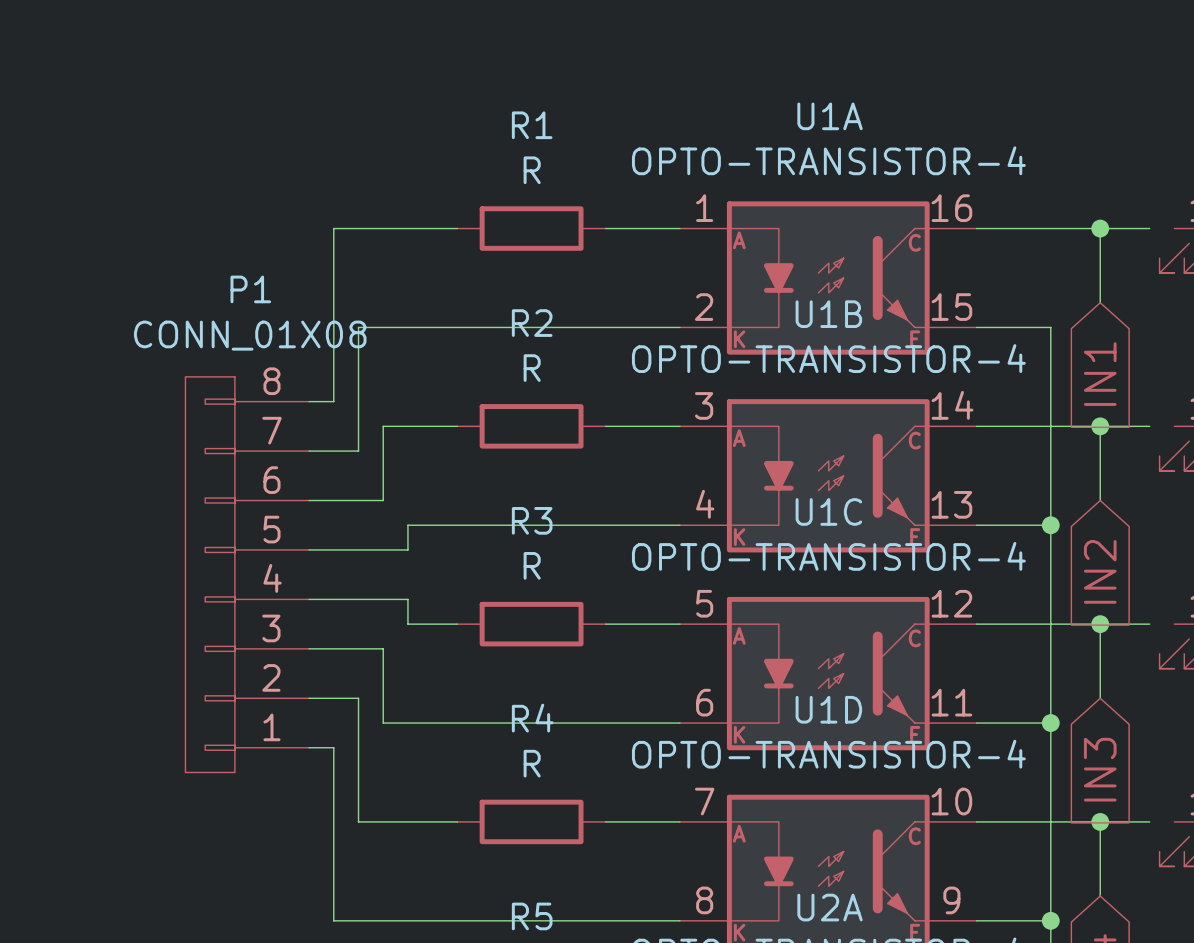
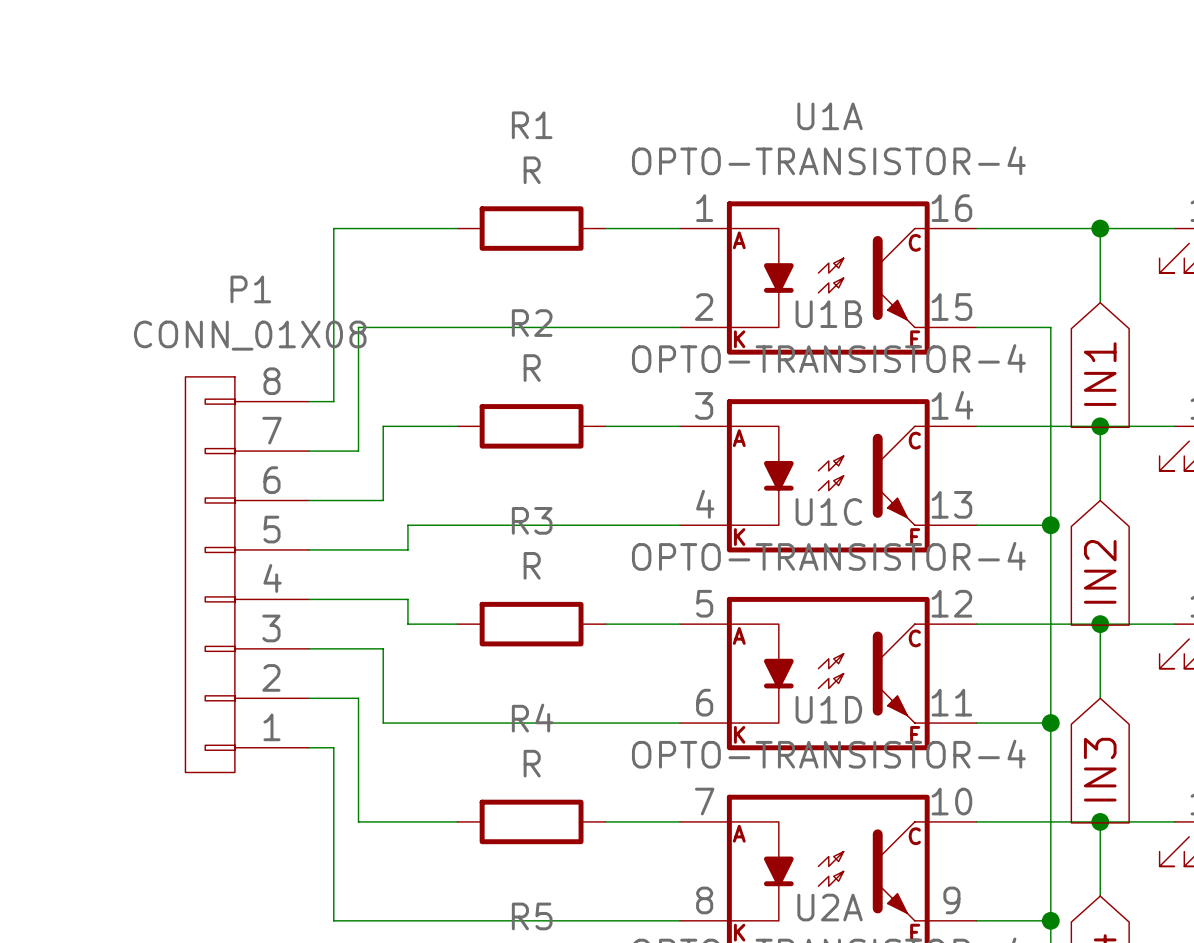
wire: none -> (1149, 228) (1174, 228)
wire: none -> (1149, 426) (1174, 426)
wire: none -> (1149, 624) (1174, 624)
wire: none -> (1149, 821) (1174, 821)

